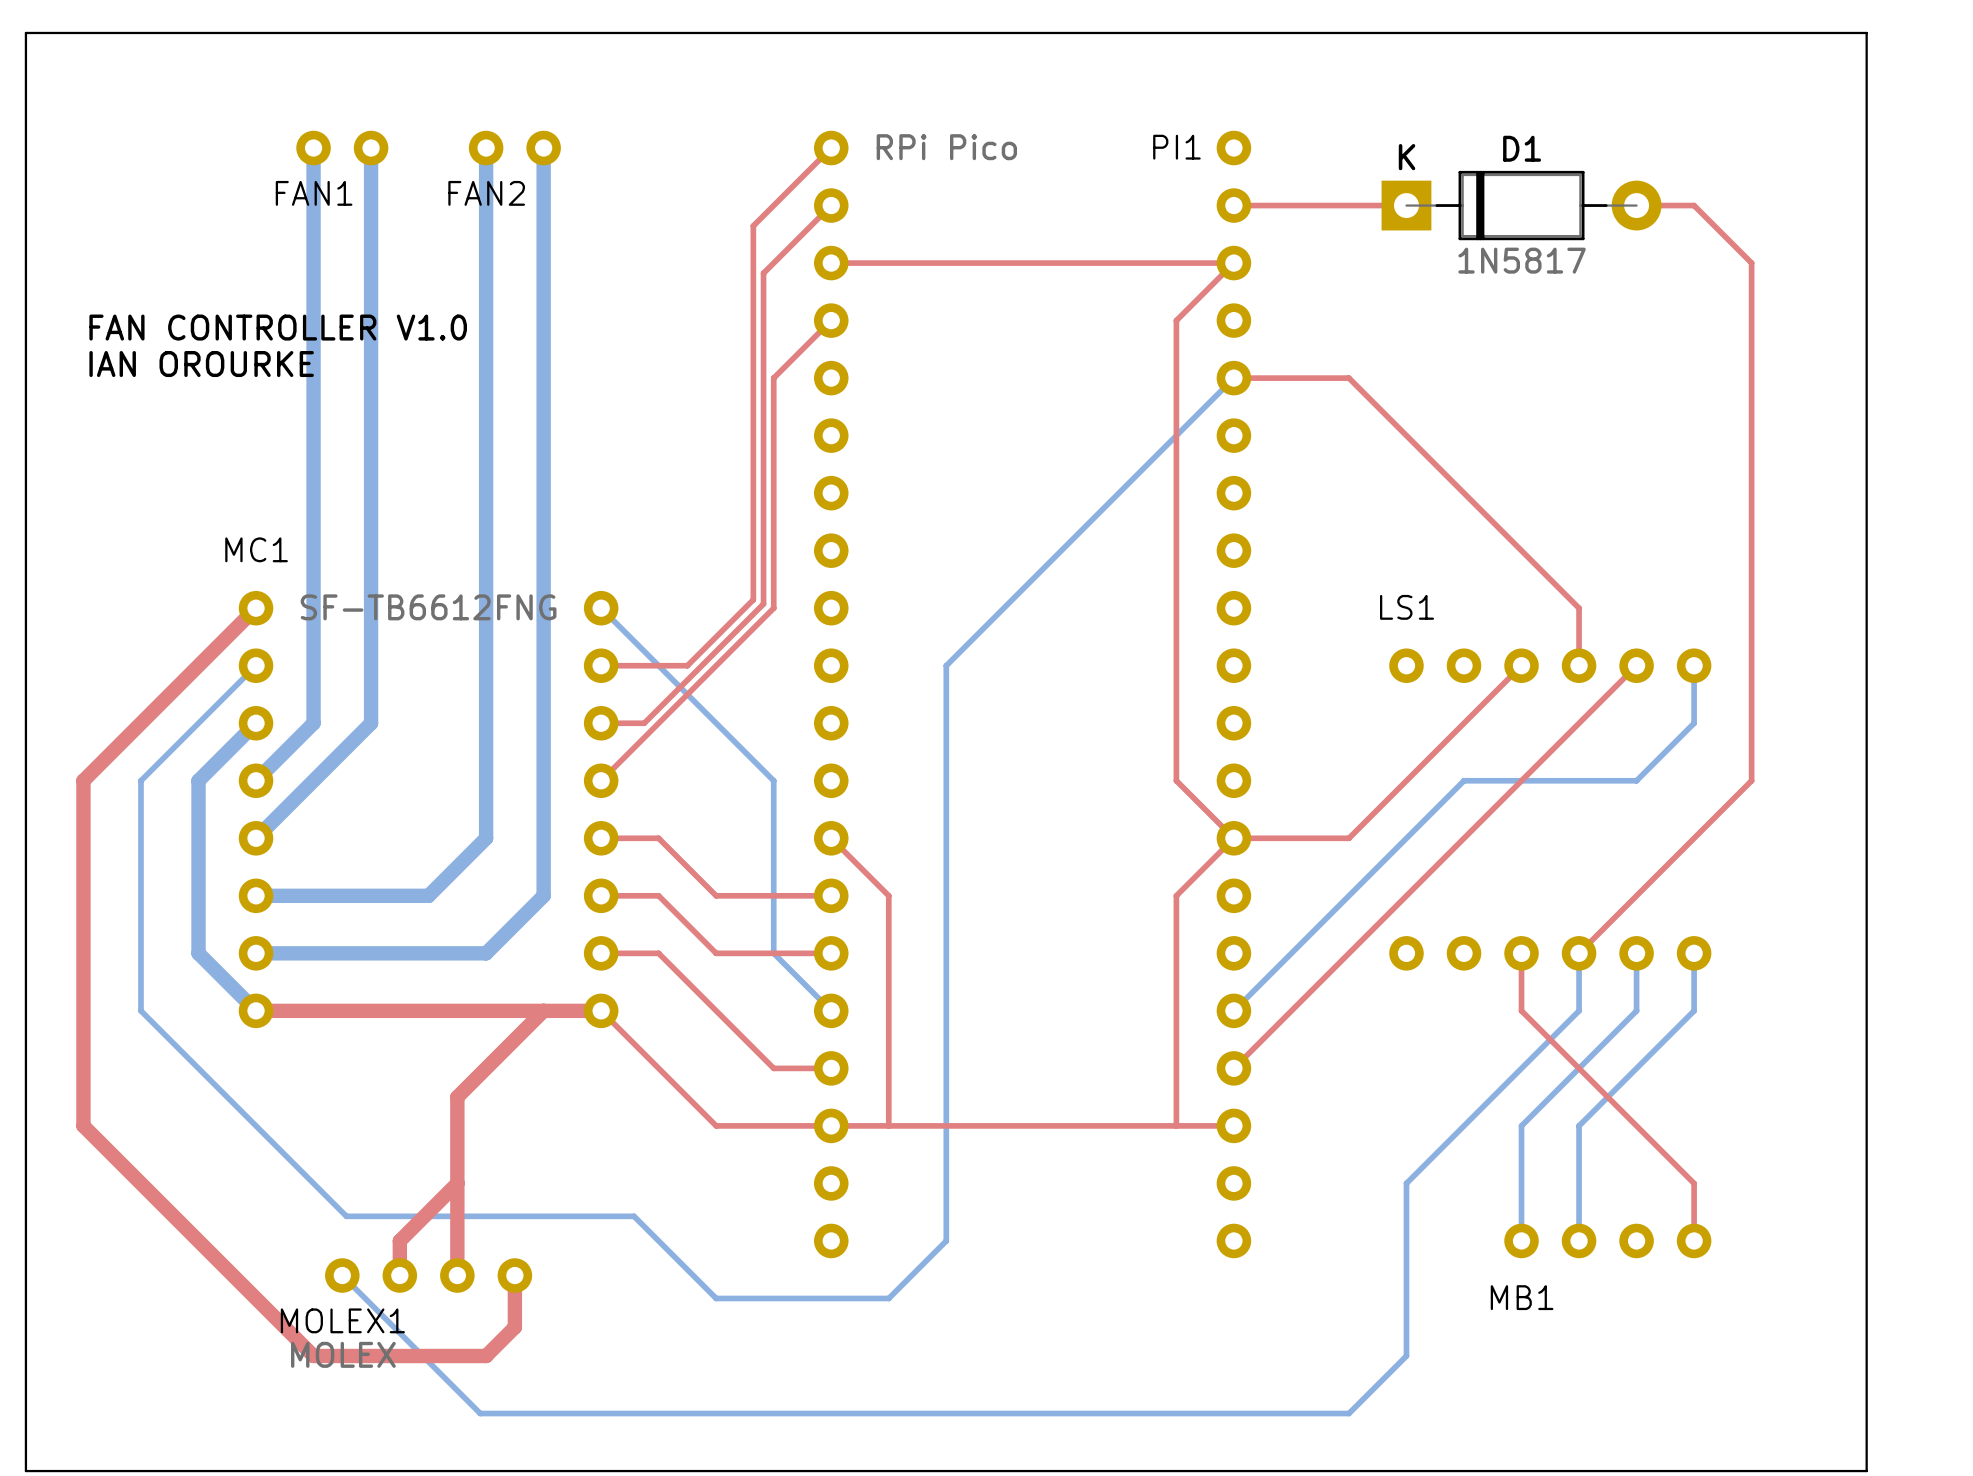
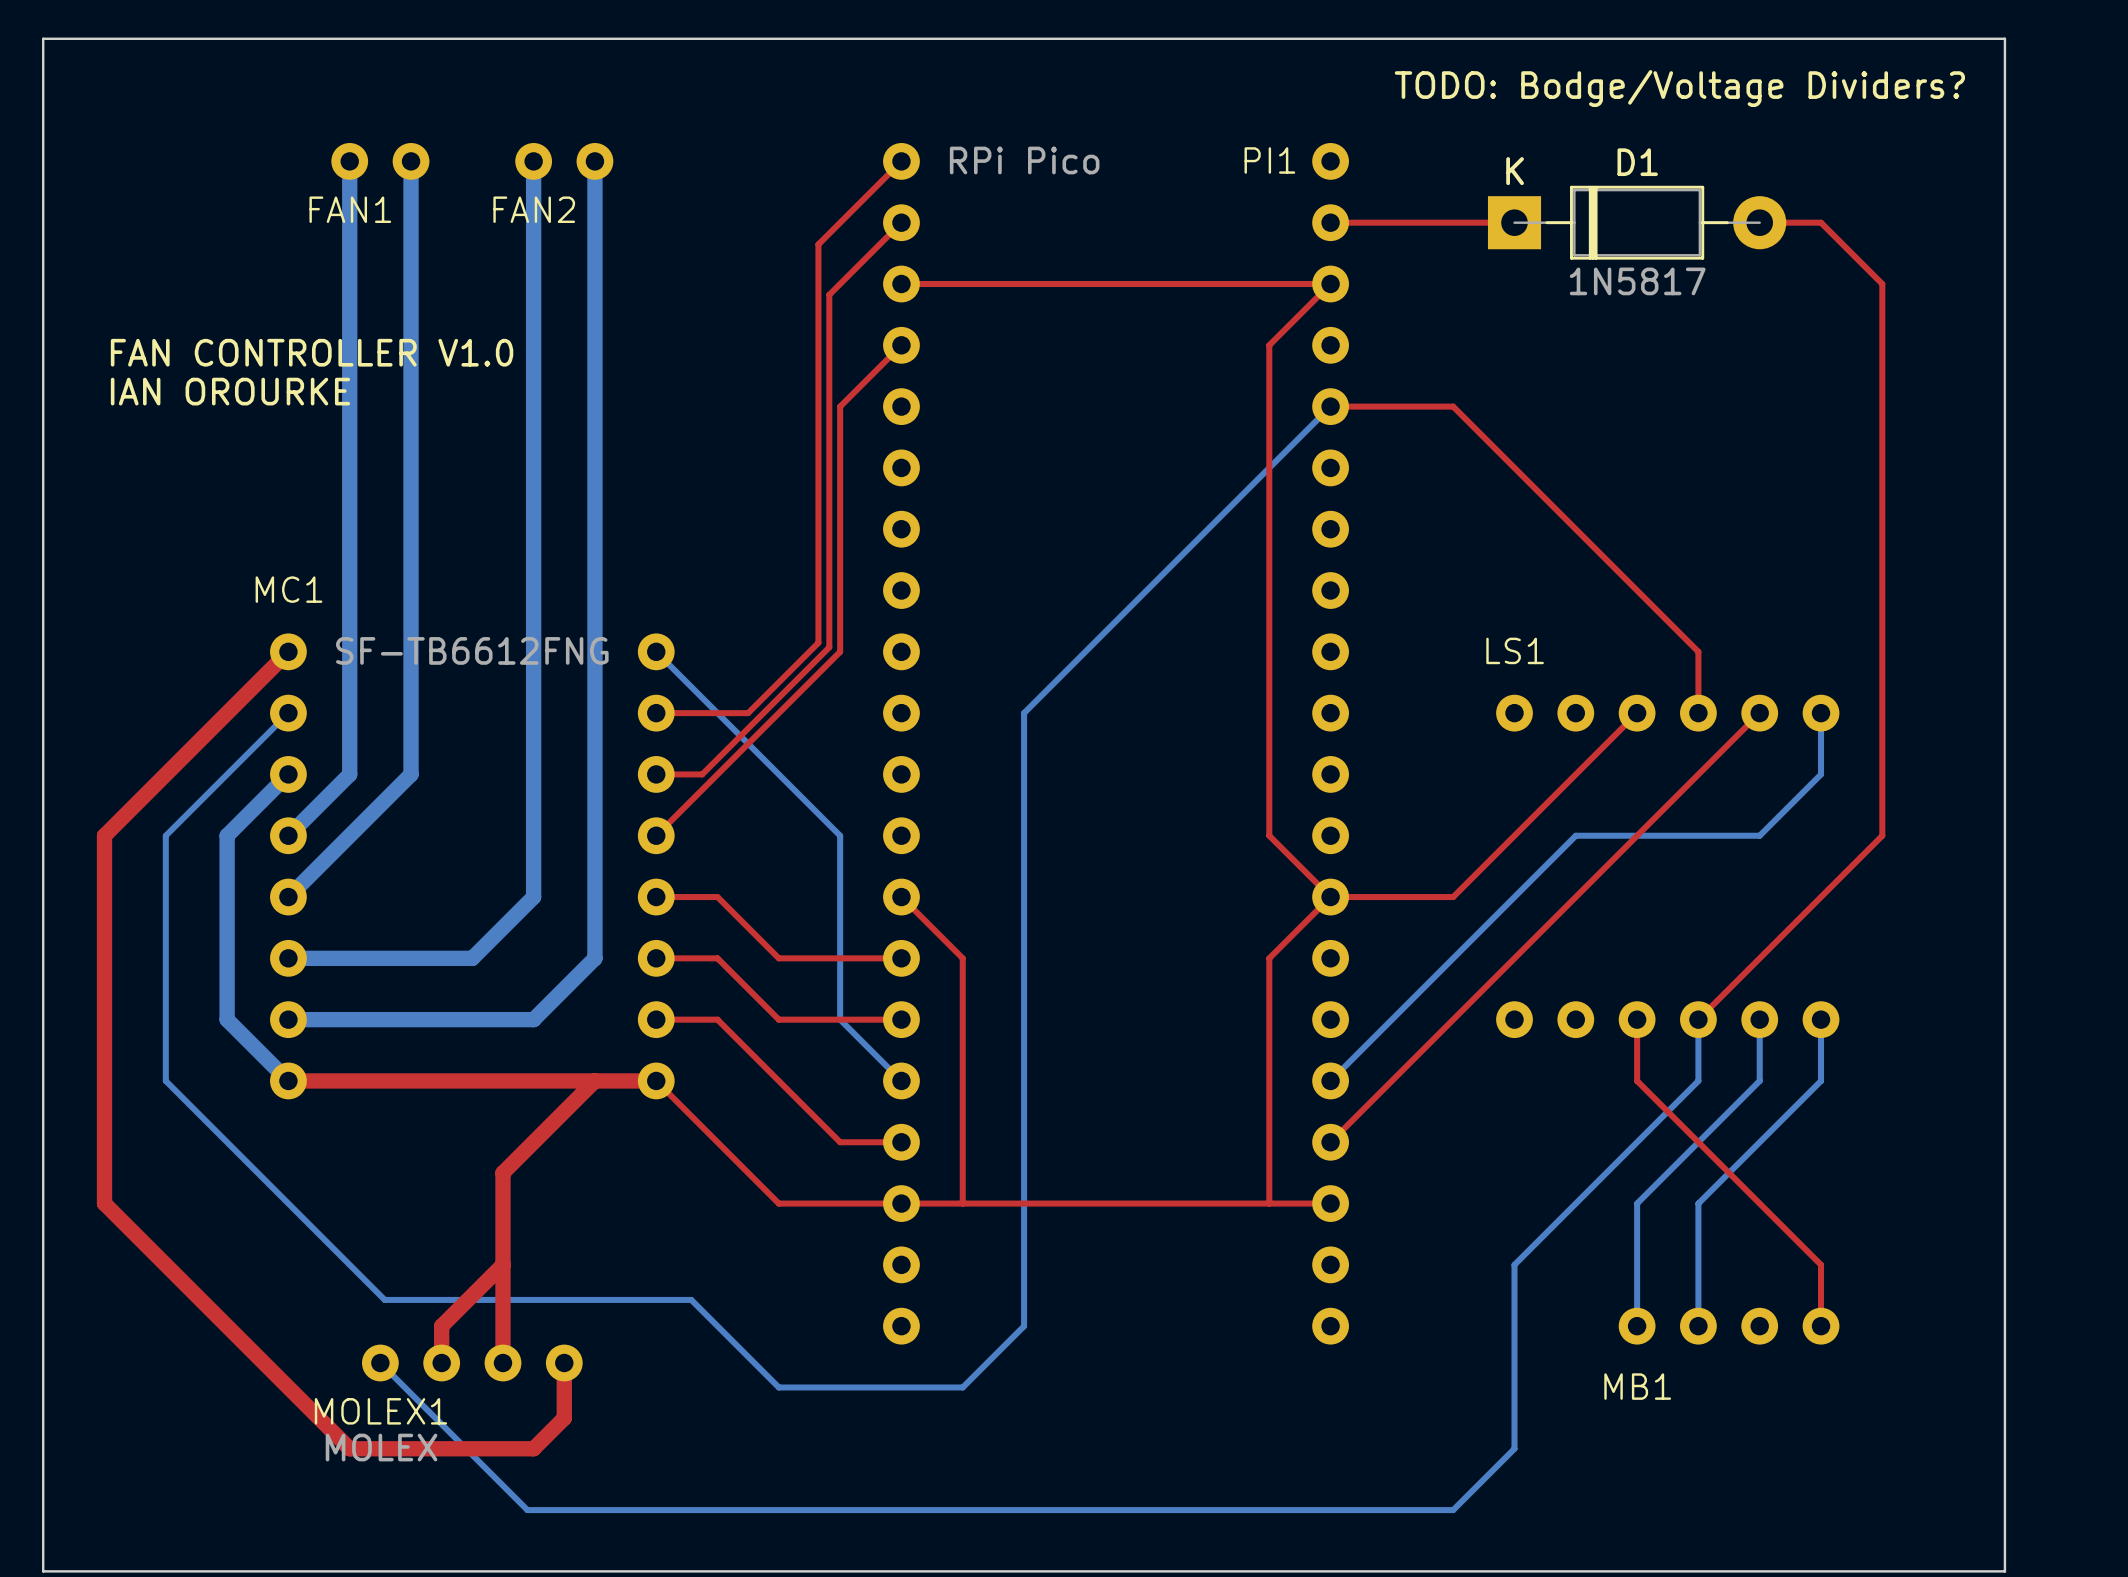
text: none -> TODO: Bodge/Voltage Dividers? (1679, 88)

